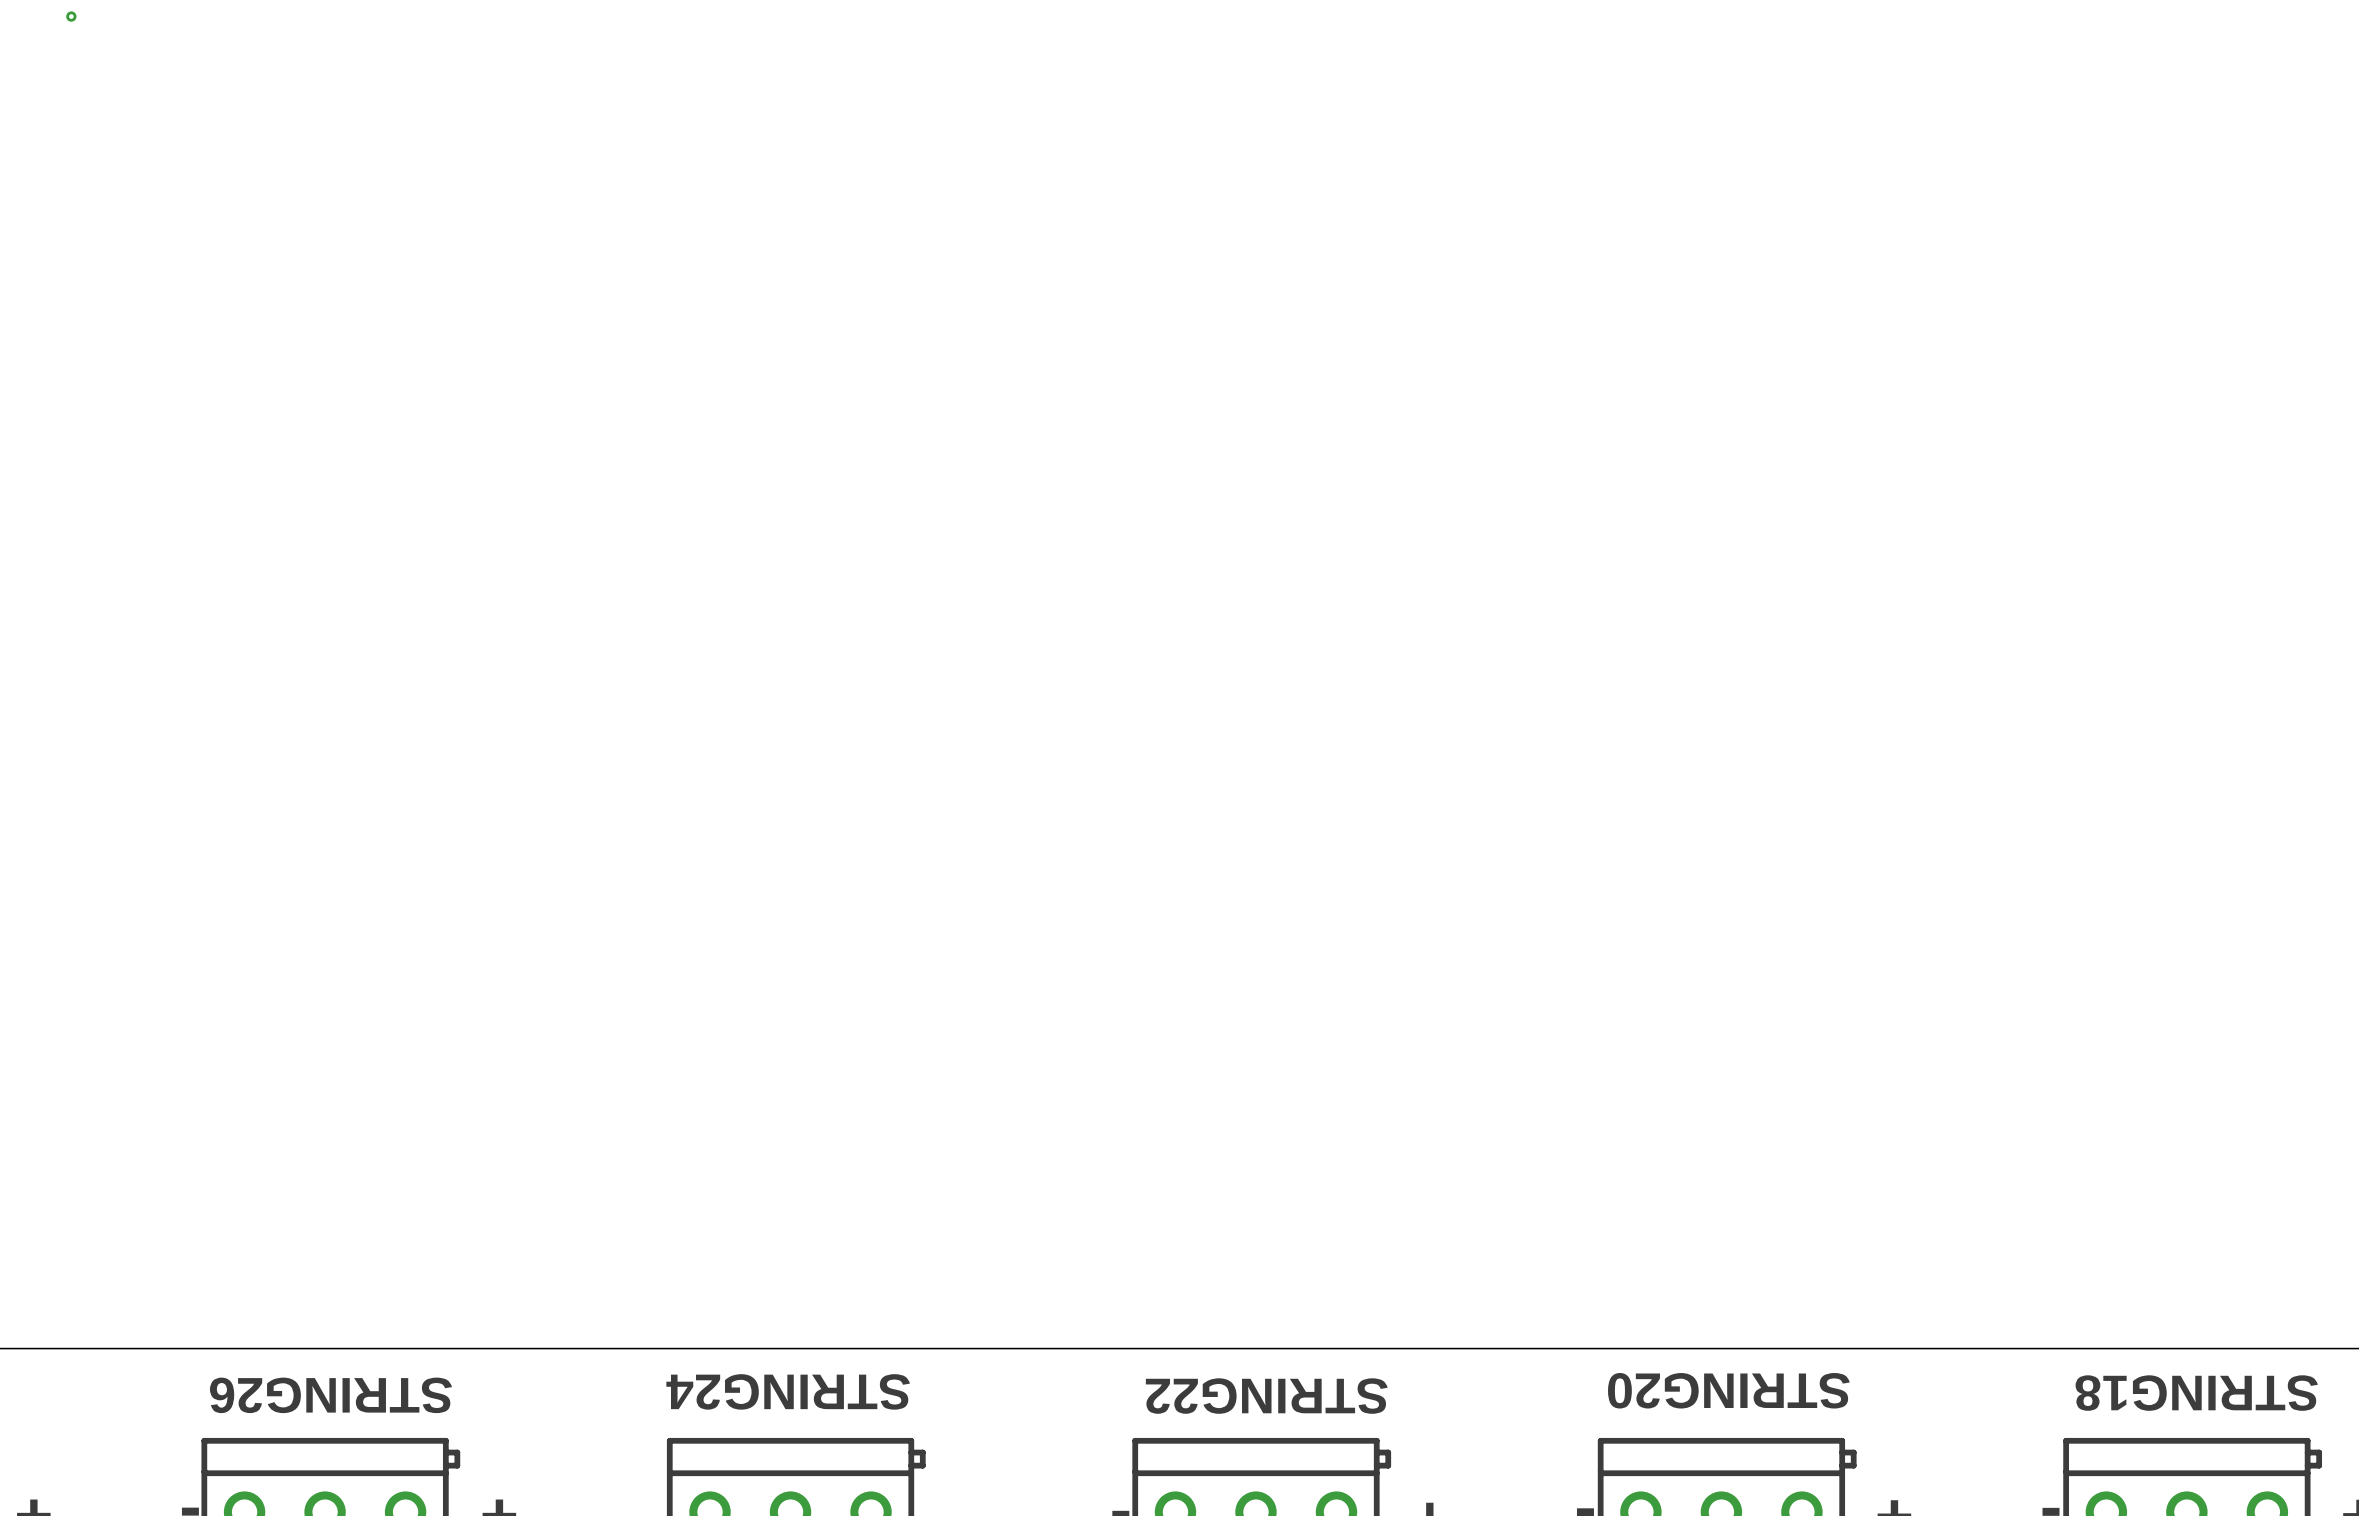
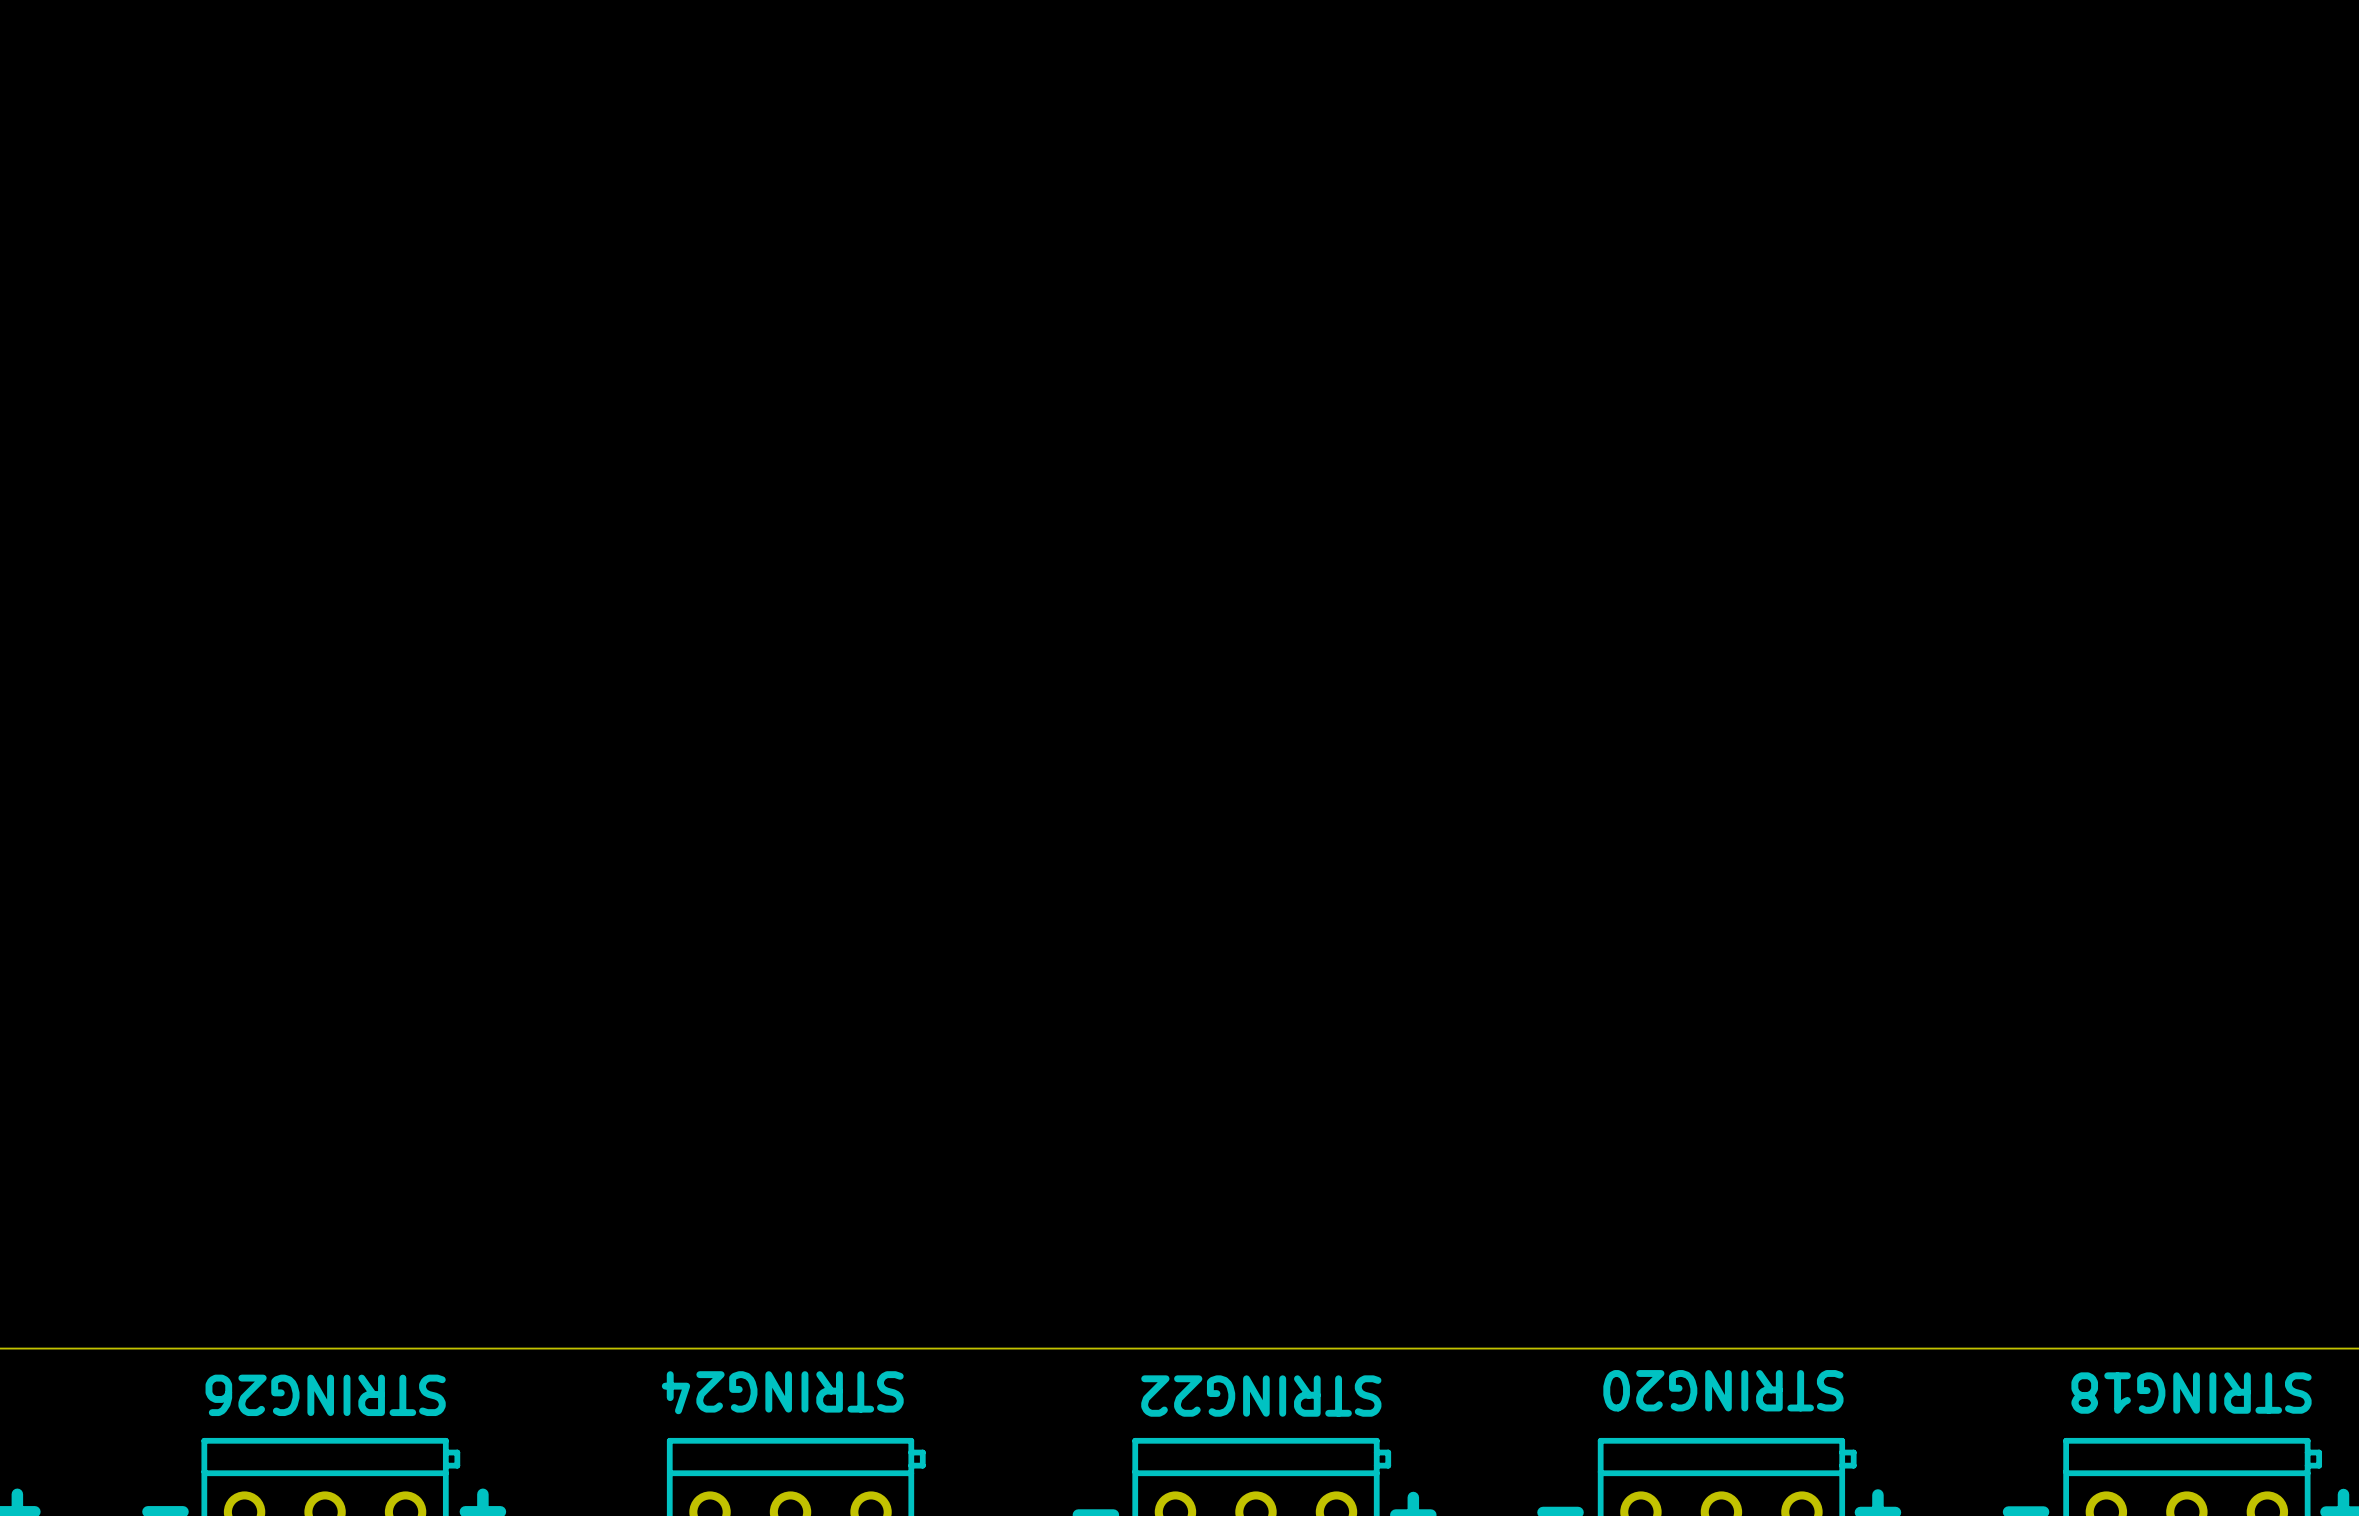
via: (71, 16) -> none

